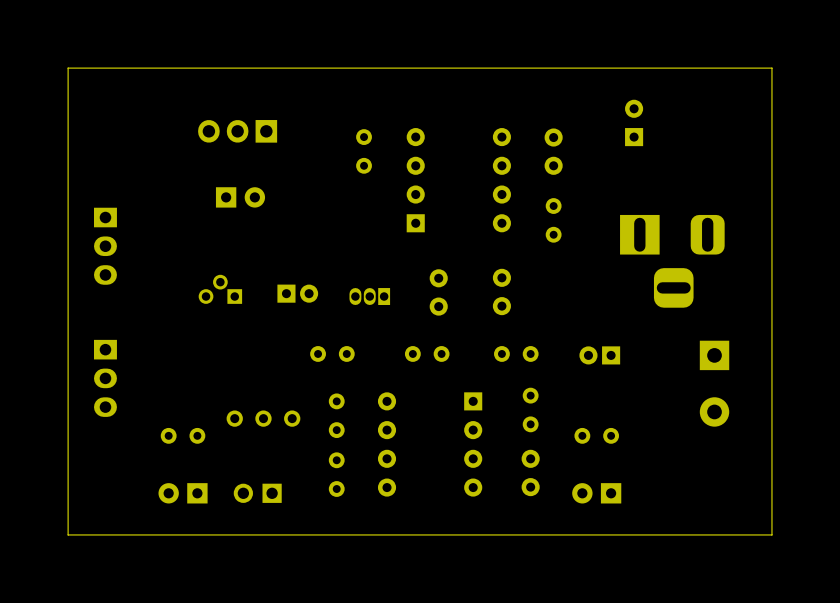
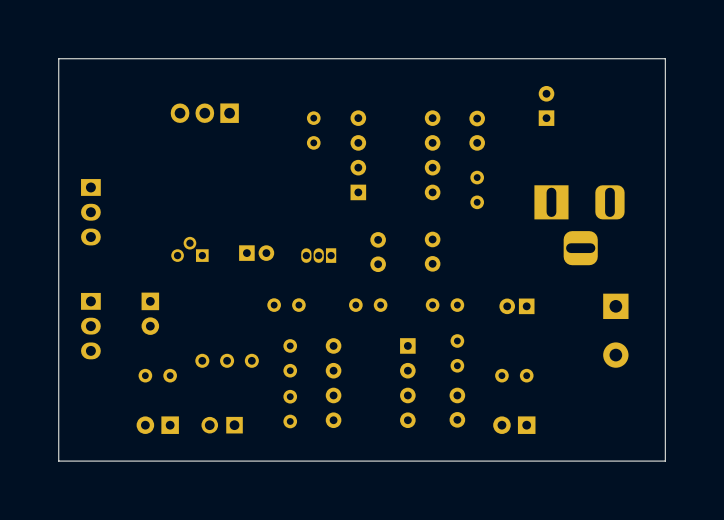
part rotation: 0° (240, 197) -> 90° clockwise (150, 313)
part position: (240, 197) -> (150, 313)

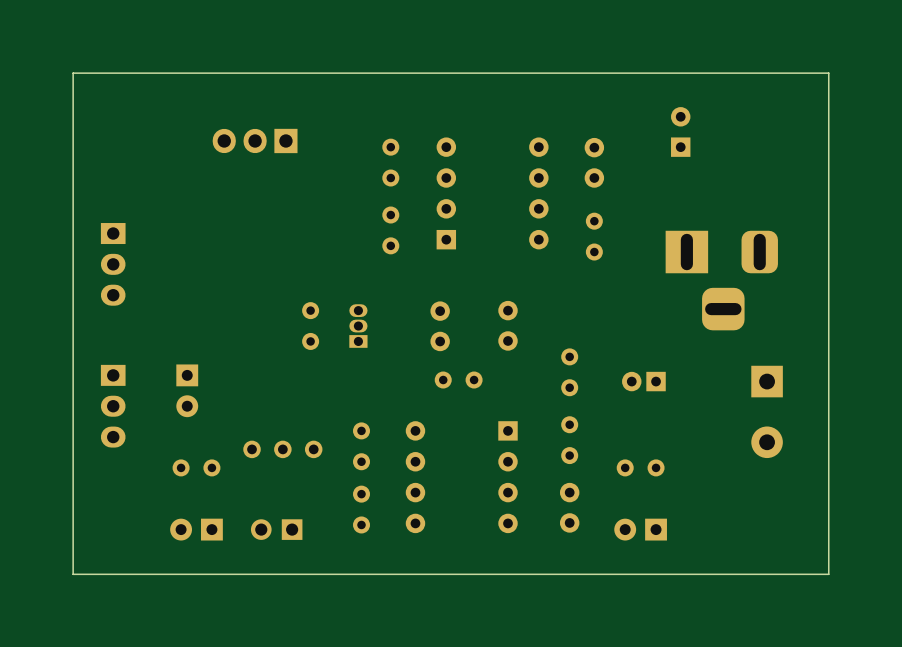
part: none -> (390, 230)
part: (189, 249) -> none
part: (432, 251) -> none
part: (378, 252) -> none
part: (256, 253) -> none
part rotation: 0° (318, 255) -> 90° clockwise (358, 326)
part position: (318, 255) -> (358, 326)
part: none -> (440, 326)
part: none -> (508, 325)
part rotation: 0° (286, 305) -> 90° clockwise (310, 326)
part position: (286, 305) -> (310, 326)
part rotation: 0° (444, 305) -> 90° clockwise (569, 372)

